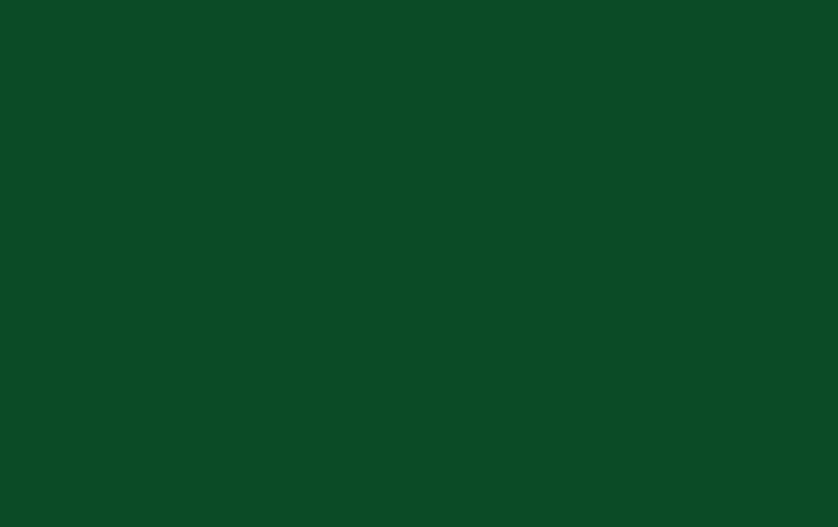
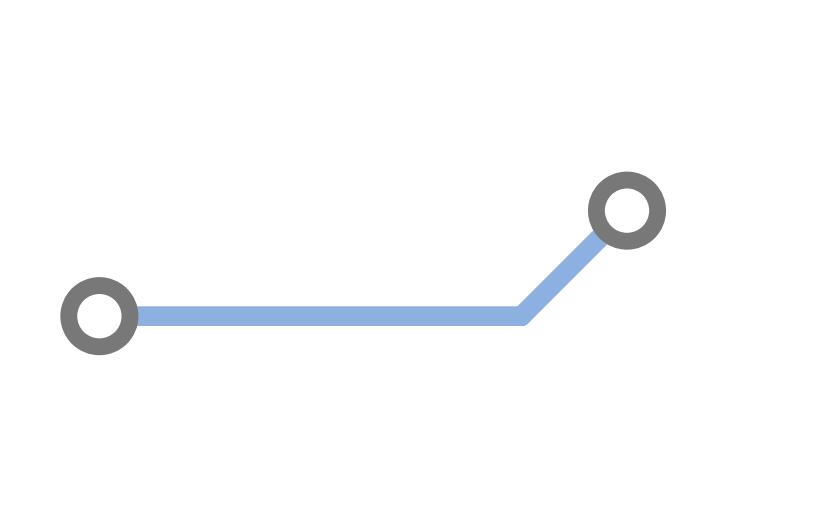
track: none -> (627, 210) (521, 316) (99, 316)
via: none -> (627, 210)
via: none -> (99, 316)

